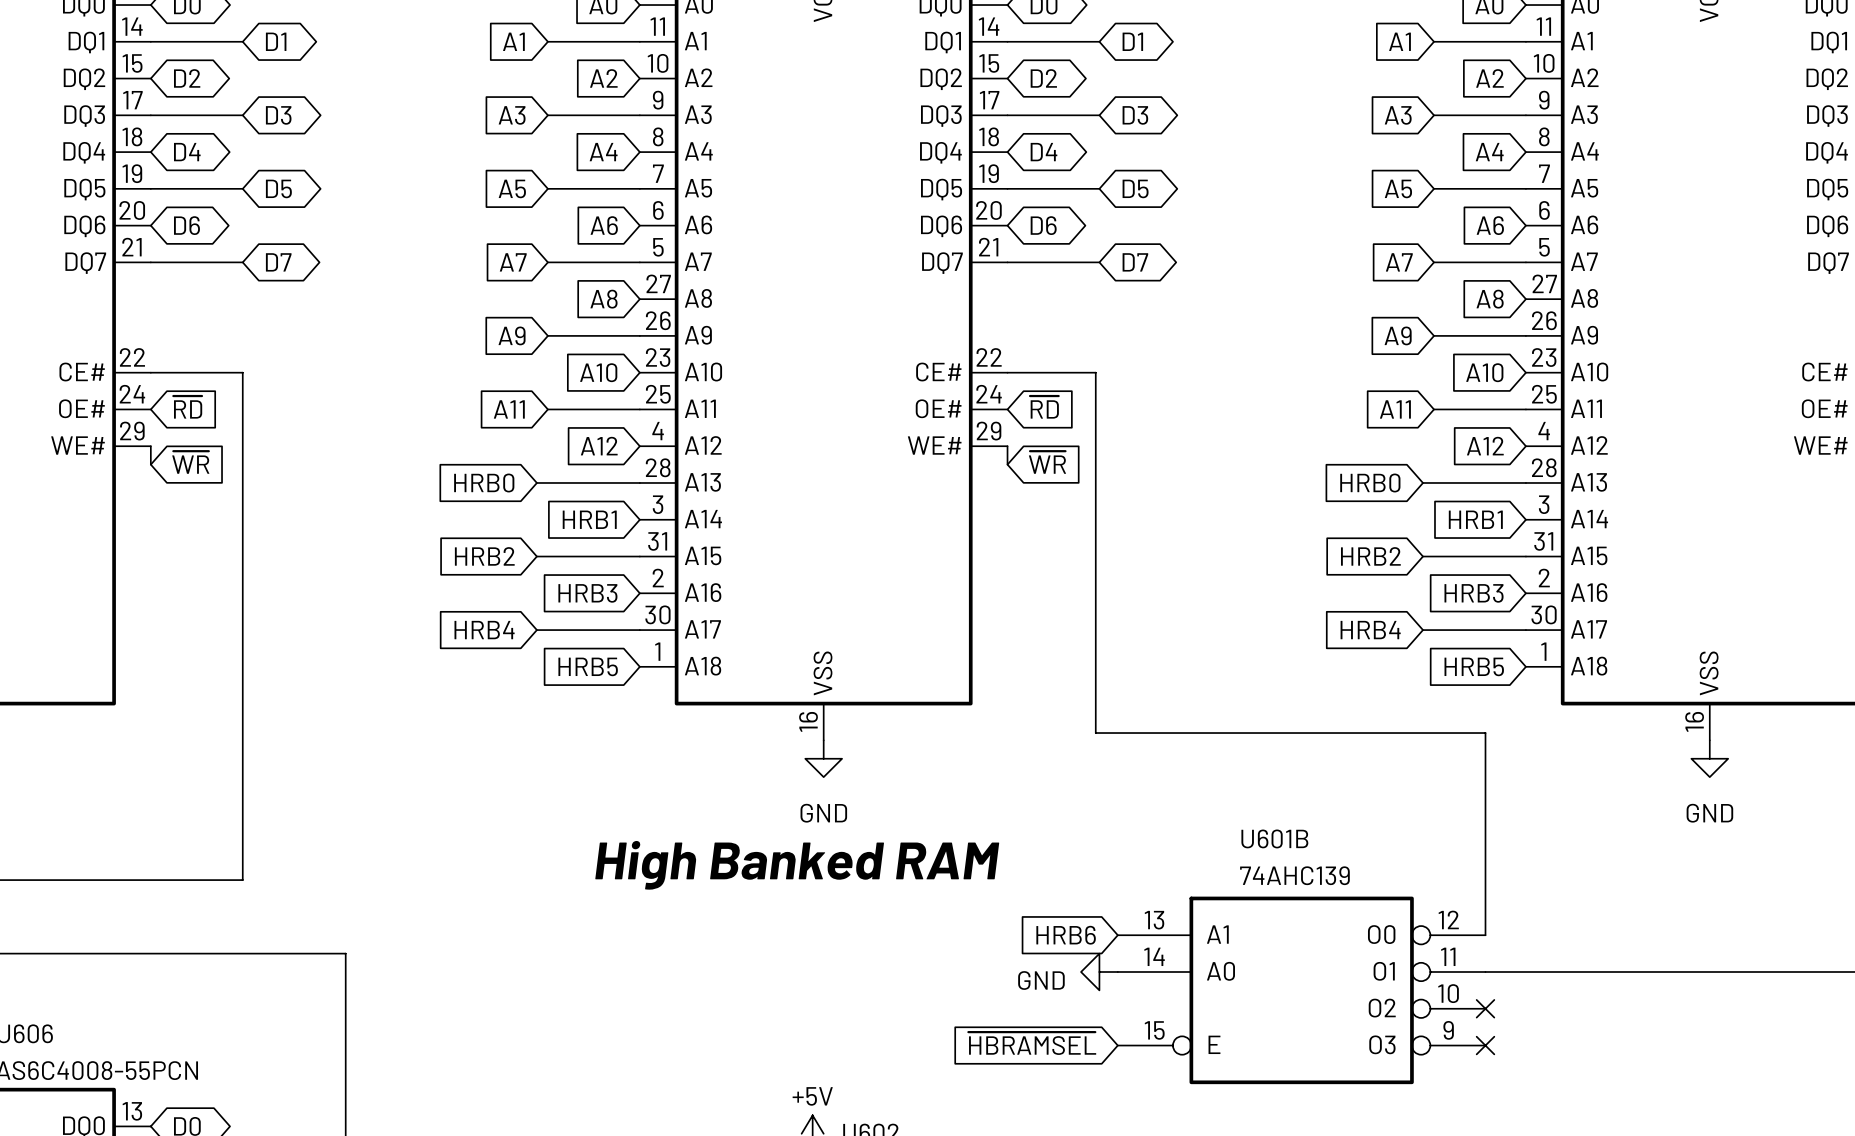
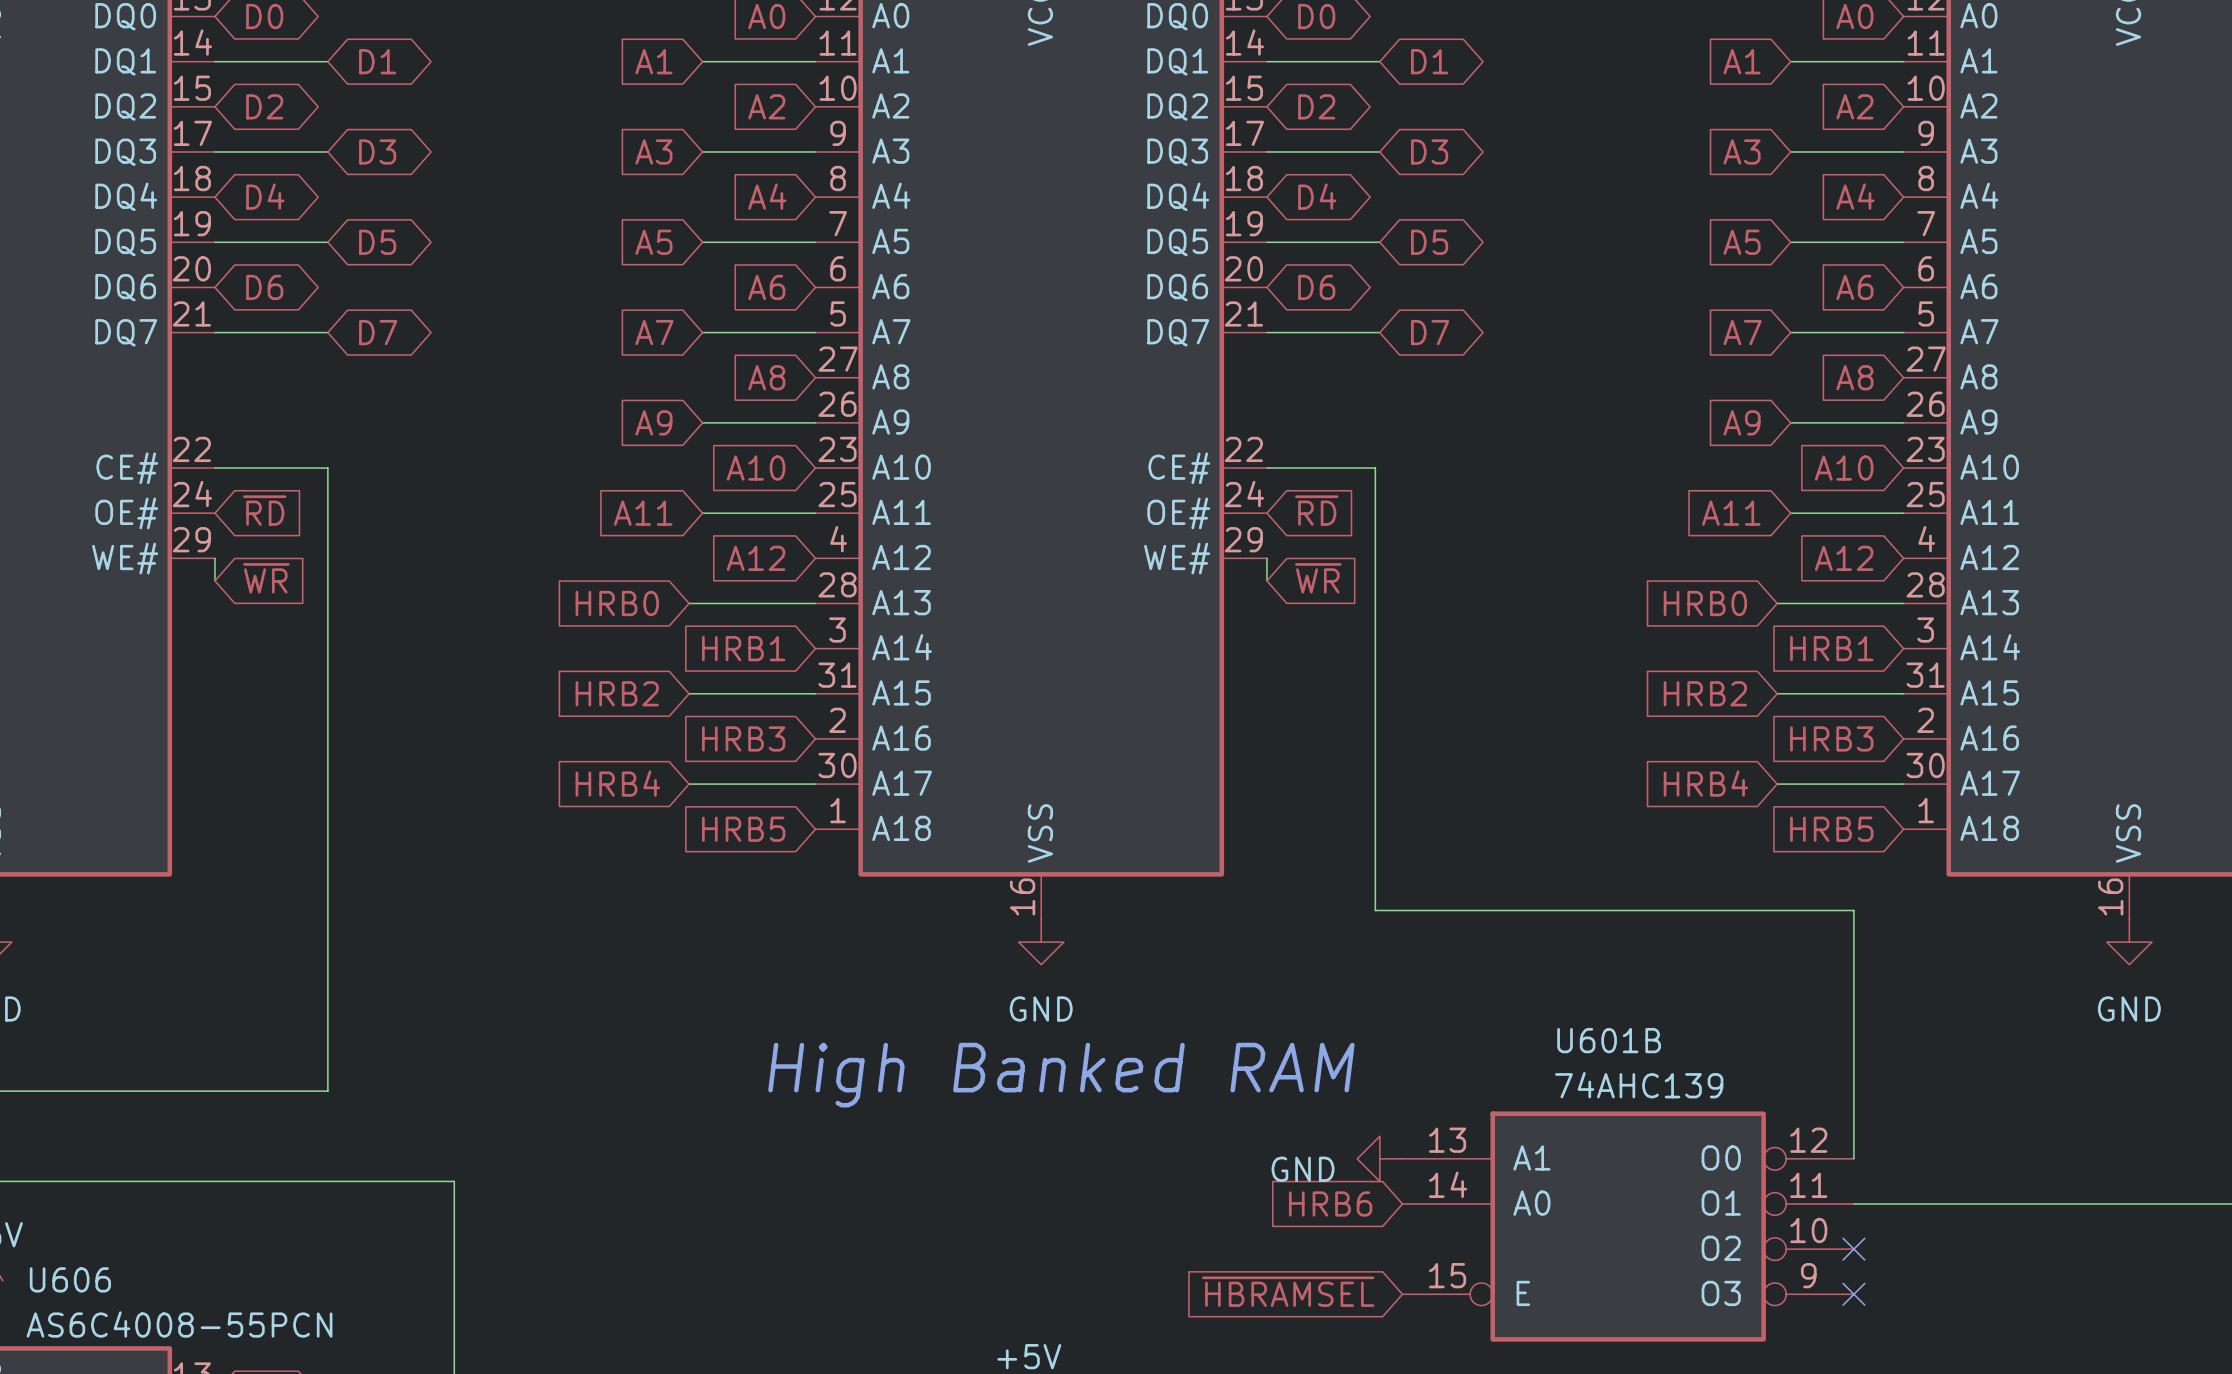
global label position: HRB6 (1066, 935) -> HRB6 (1330, 1203)
power symbol position: GND (1099, 971) -> GND (1379, 1158)

